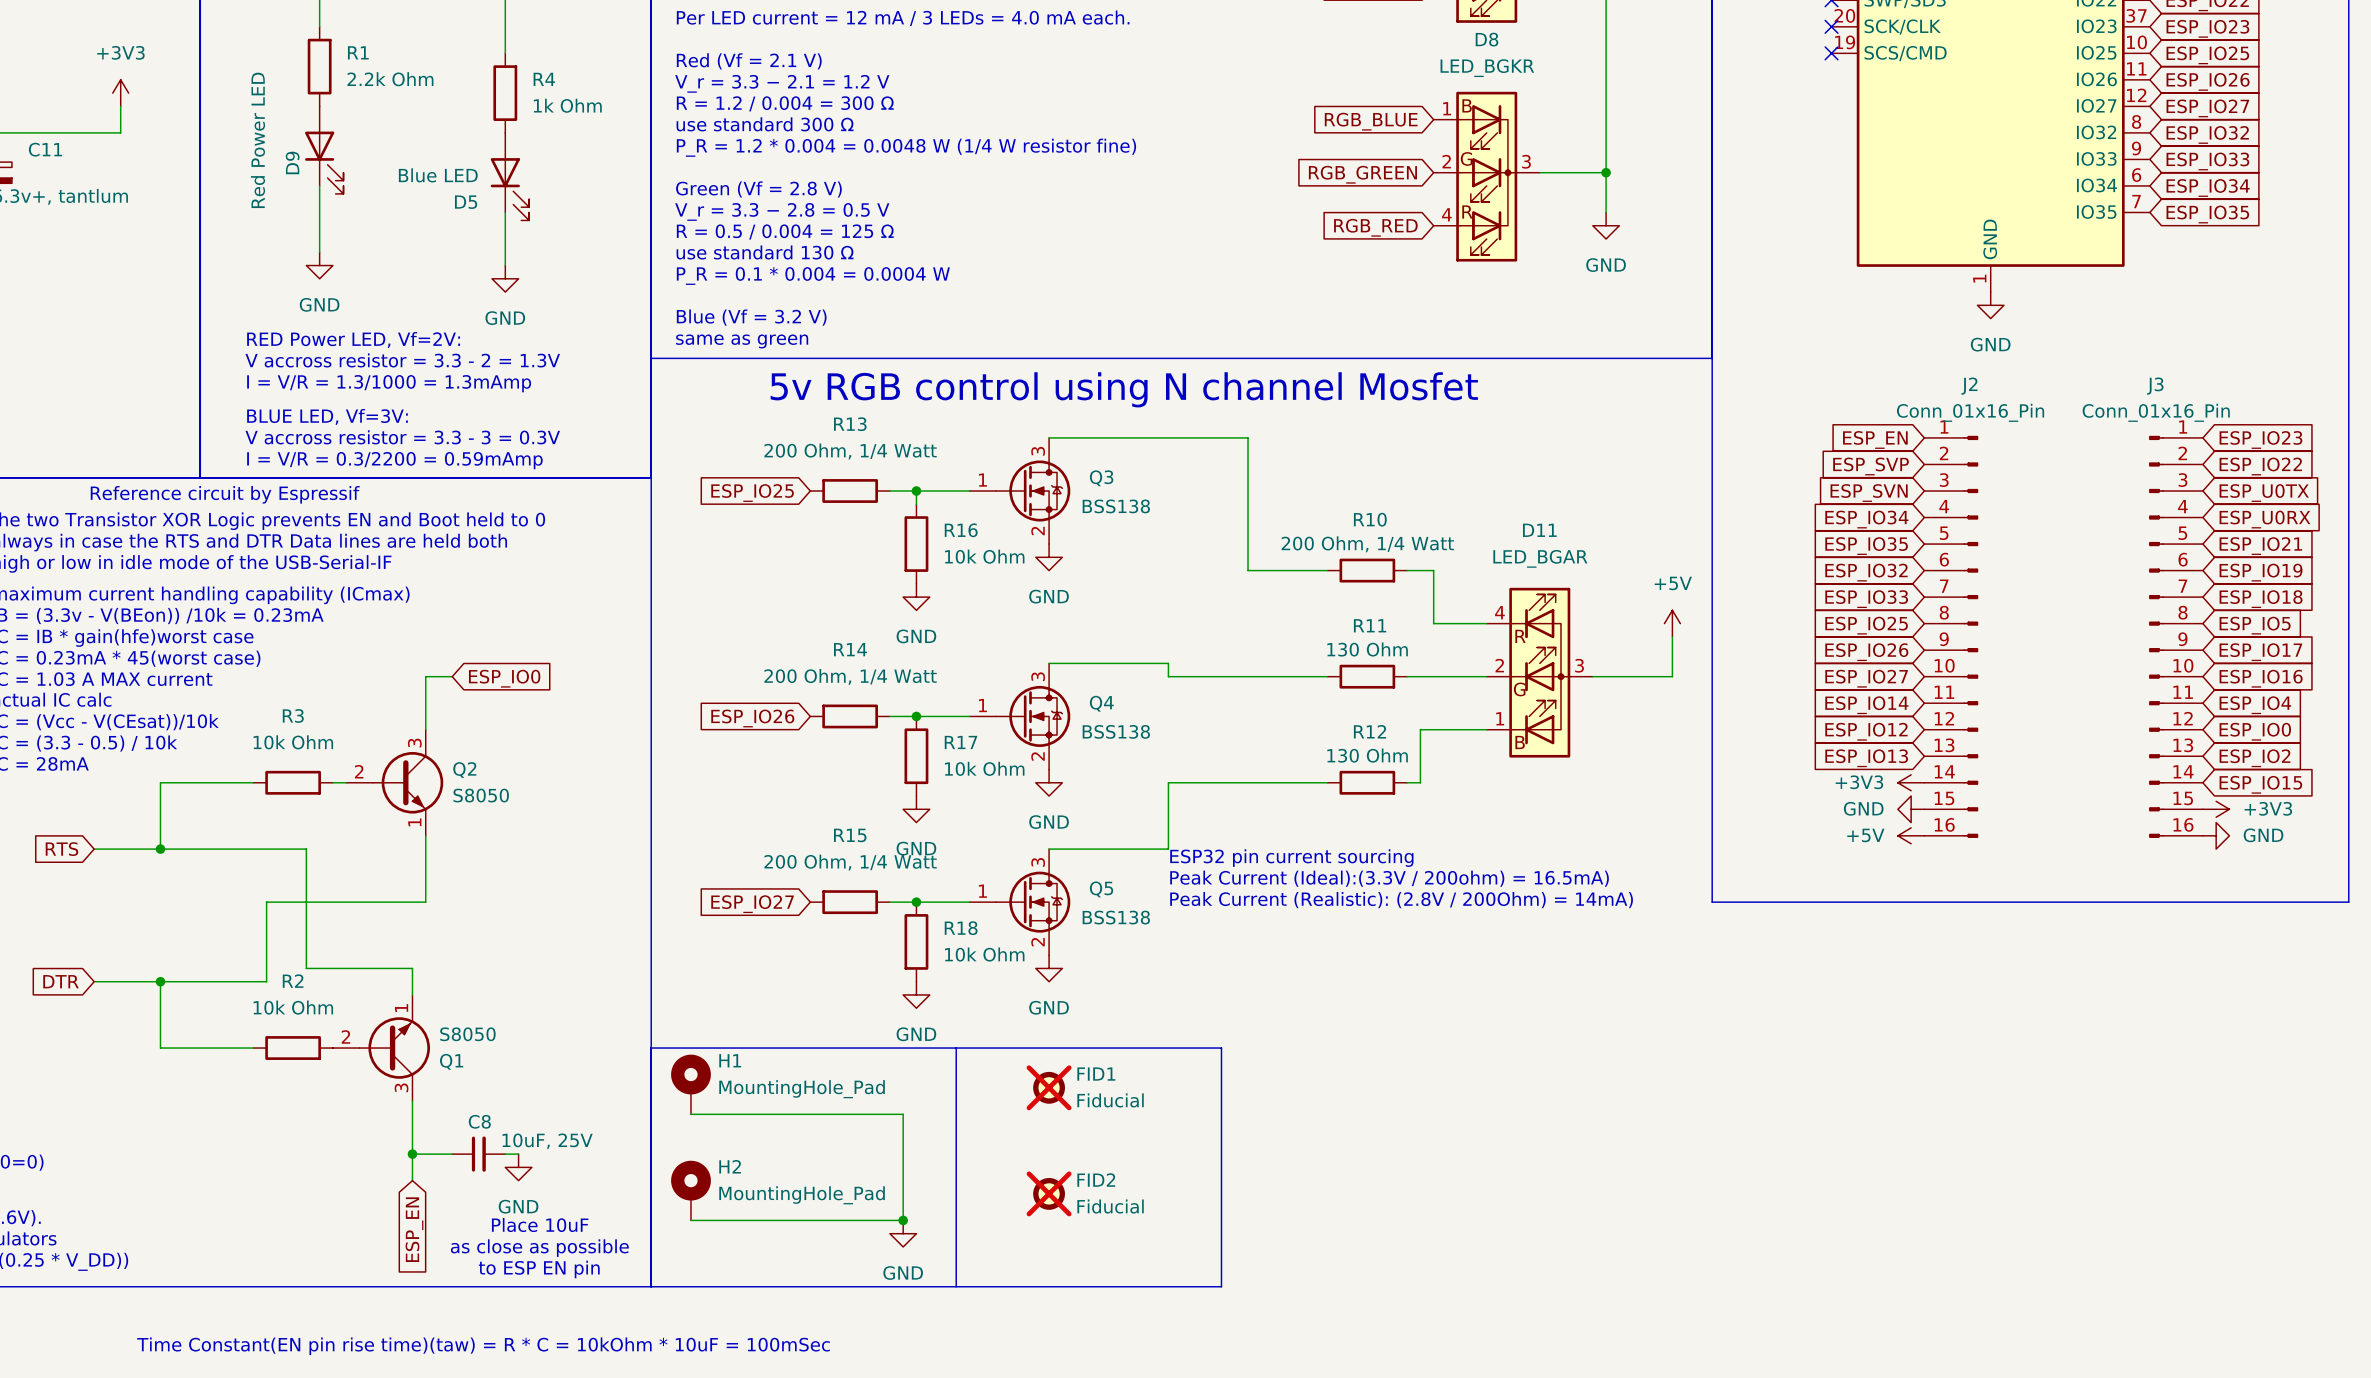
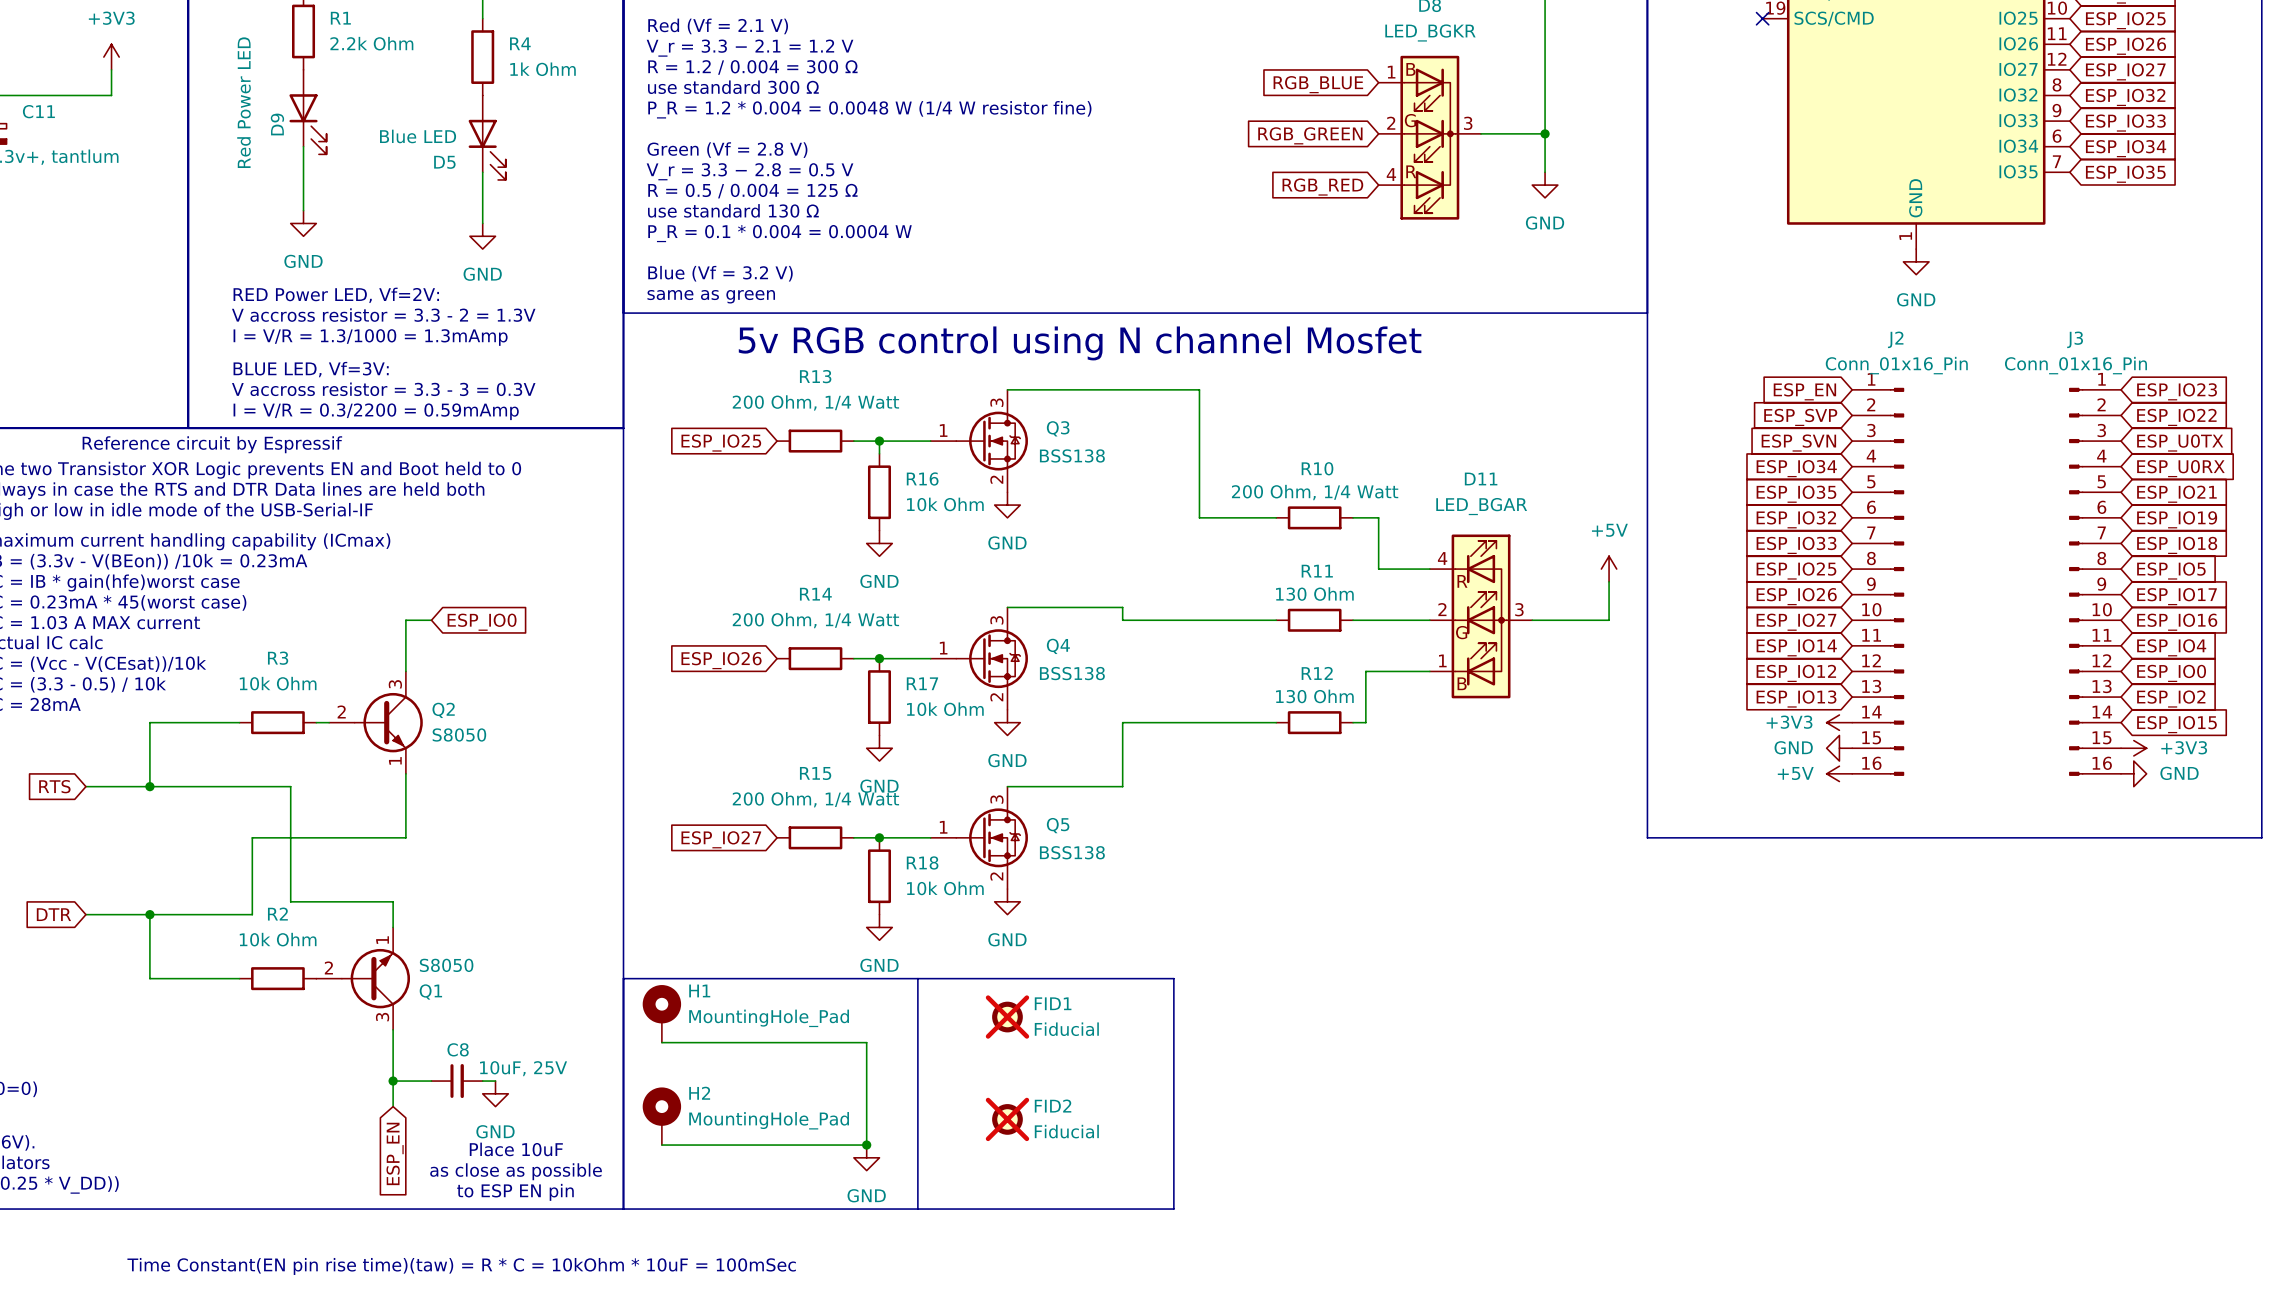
text: ESP32 pin current sourcing (1291, 858) -> none
text: Peak Current (Ideal):(3.3V / 200ohm) = 16.5mA) (1389, 878) -> none
text: Peak Current (Realistic): (2.8V / 200Ohm) = 14mA) (1401, 900) -> none

